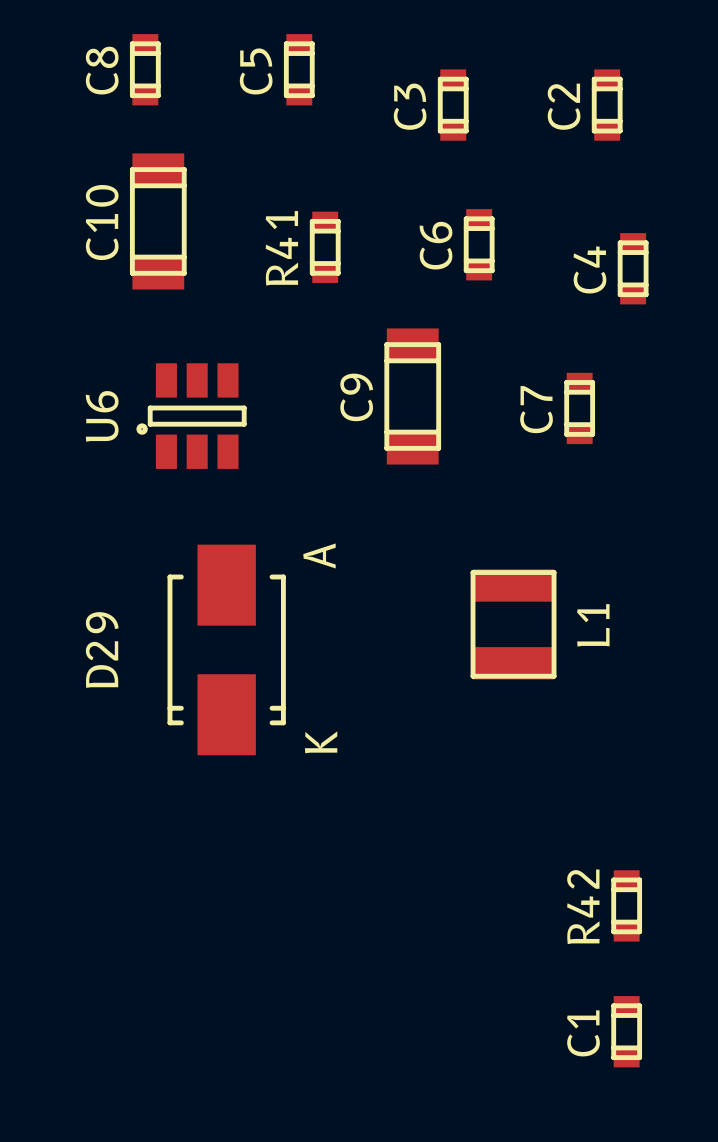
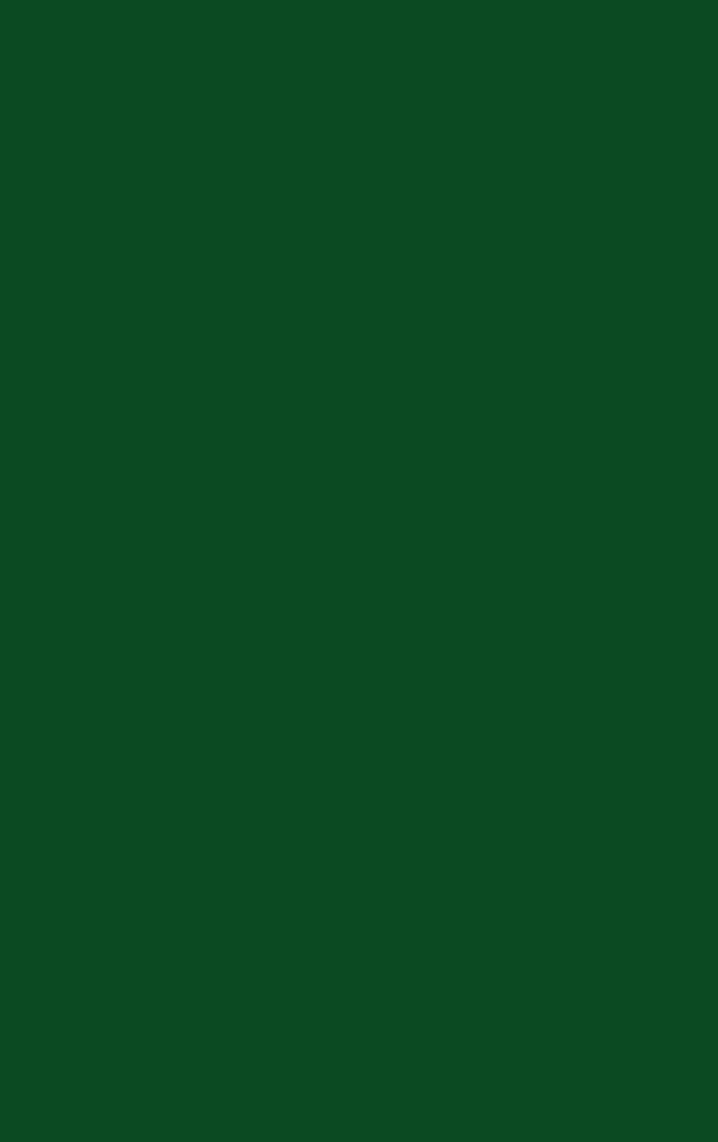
C8: (145, 69) -> none
C5: (299, 69) -> none
C3: (453, 105) -> none
C2: (607, 105) -> none
C10: (158, 221) -> none
C6: (479, 244) -> none
R41: (325, 247) -> none
C4: (633, 268) -> none
C9: (412, 396) -> none
C7: (579, 408) -> none
U6: (191, 416) -> none
L1: (513, 624) -> none
D29: (226, 649) -> none
R42: (626, 905) -> none
C1: (626, 1031) -> none

